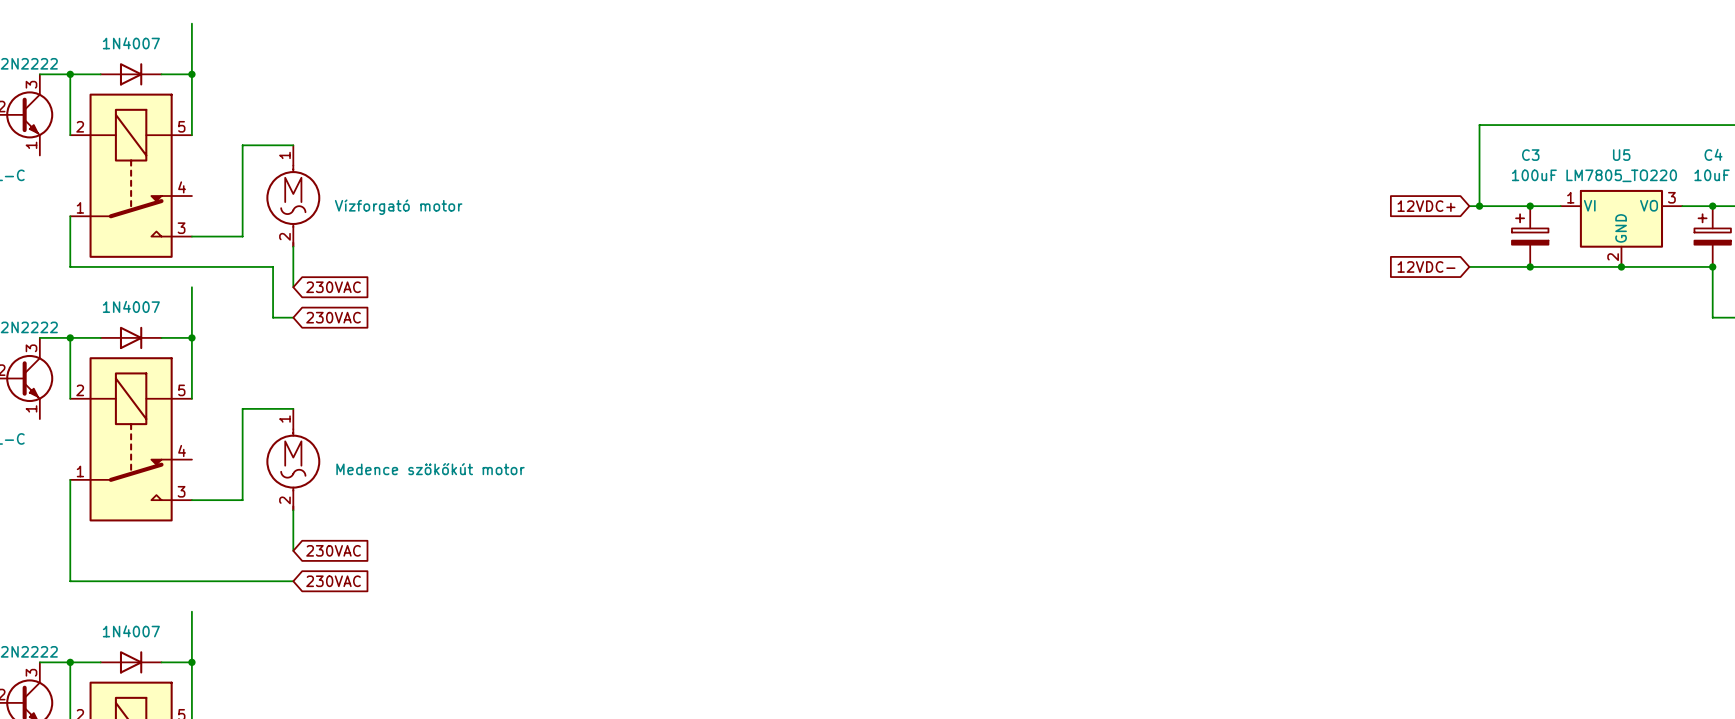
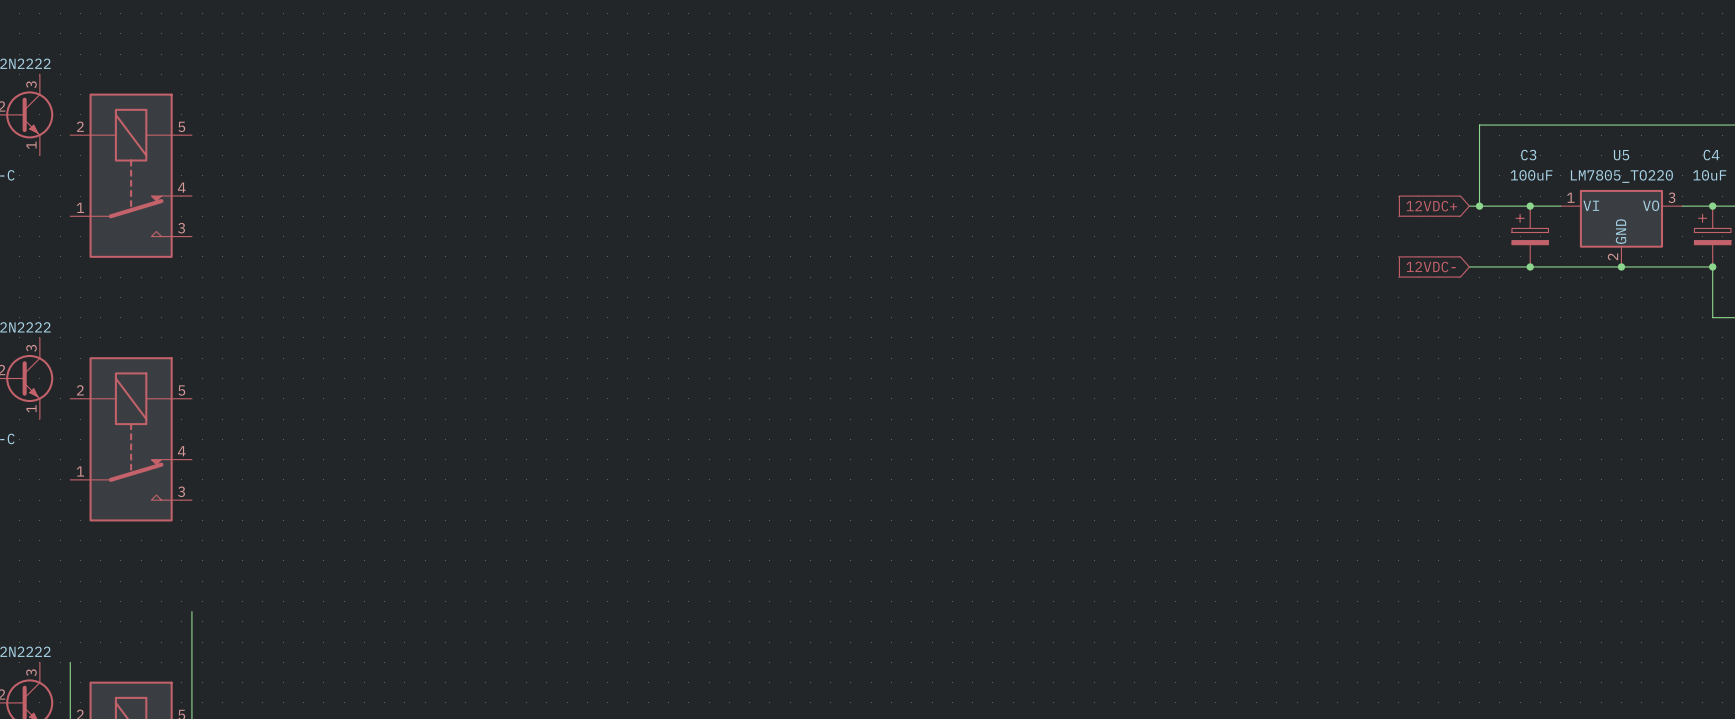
wire: (191, 23) (191, 135) -> none
wire: (39, 74) (100, 74) -> none
wire: (70, 74) (70, 135) -> none
junction: (70, 74) -> none
part: 1N4007 (131, 74) -> none
wire: (161, 74) (191, 74) -> none
junction: (191, 74) -> none
wire: (293, 145) (242, 145) (242, 236) (191, 236) -> none
part: Vízforgató motor (293, 196) -> none
wire: (70, 216) (70, 266) (273, 266) (273, 317) (293, 317) -> none
wire: (293, 246) (293, 287) -> none
wire: (191, 287) (191, 398) -> none
global label: 230VAC (333, 287) -> none
global label: 230VAC (333, 317) -> none
wire: (39, 337) (100, 337) -> none
wire: (70, 337) (70, 398) -> none
junction: (70, 337) -> none
part: 1N4007 (131, 337) -> none
wire: (161, 337) (191, 337) -> none
junction: (191, 337) -> none
wire: (293, 408) (242, 408) (242, 500) (191, 500) -> none
part: Medence szökőkút motor (293, 459) -> none
wire: (70, 479) (70, 581) (293, 581) -> none
wire: (293, 510) (293, 550) -> none
global label: 230VAC (333, 550) -> none
global label: 230VAC (333, 581) -> none
wire: (39, 662) (100, 662) -> none
junction: (70, 662) -> none
part: 1N4007 (131, 662) -> none
wire: (161, 662) (191, 662) -> none
junction: (191, 662) -> none

